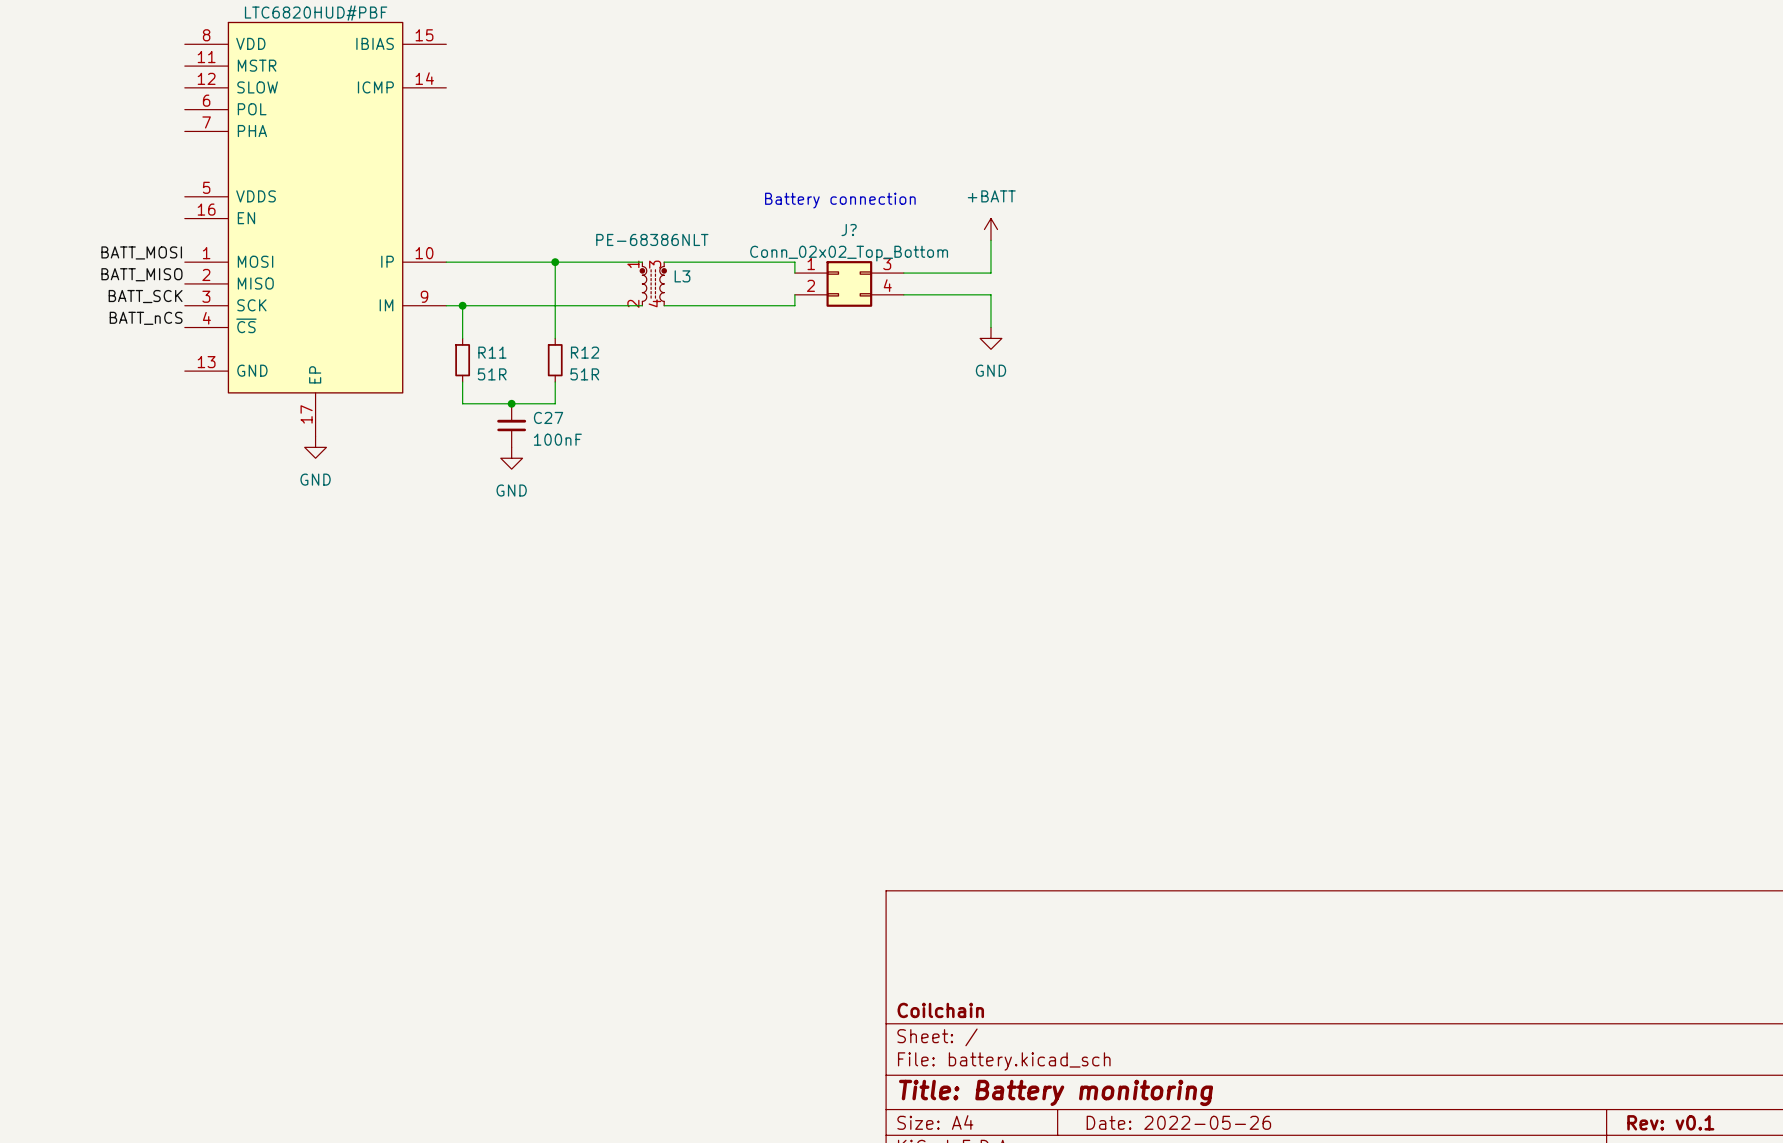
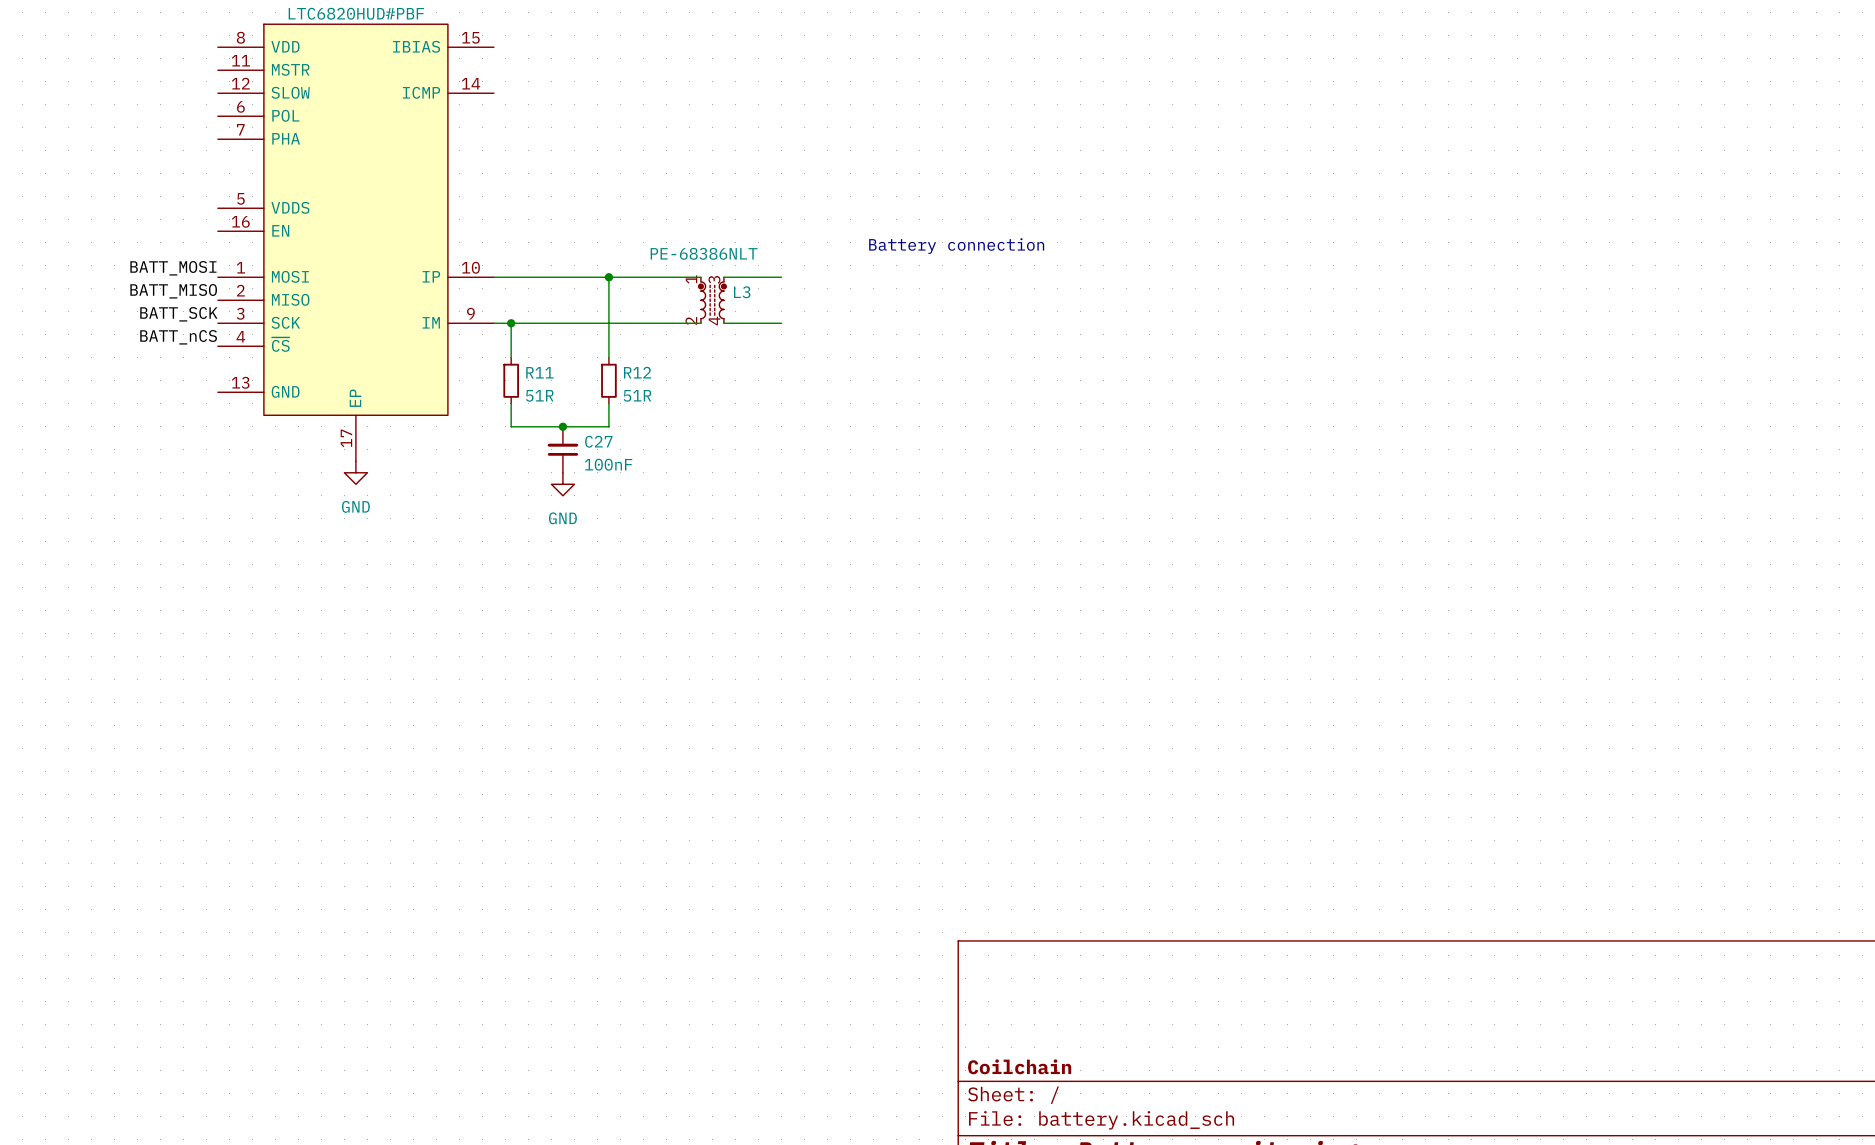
text position: Battery connection (840, 200) -> Battery connection (956, 246)
power symbol: +BATT (990, 229) -> none
wire: (990, 240) (990, 273) (903, 273) -> none
wire: (718, 262) (794, 262) (794, 273) -> none
J?: Conn_02x02_Top_Bottom (849, 283) -> none
wire: (794, 294) (794, 305) (718, 305) -> none
wire: (903, 294) (990, 294) (990, 327) -> none
power symbol: GND (990, 338) -> none

